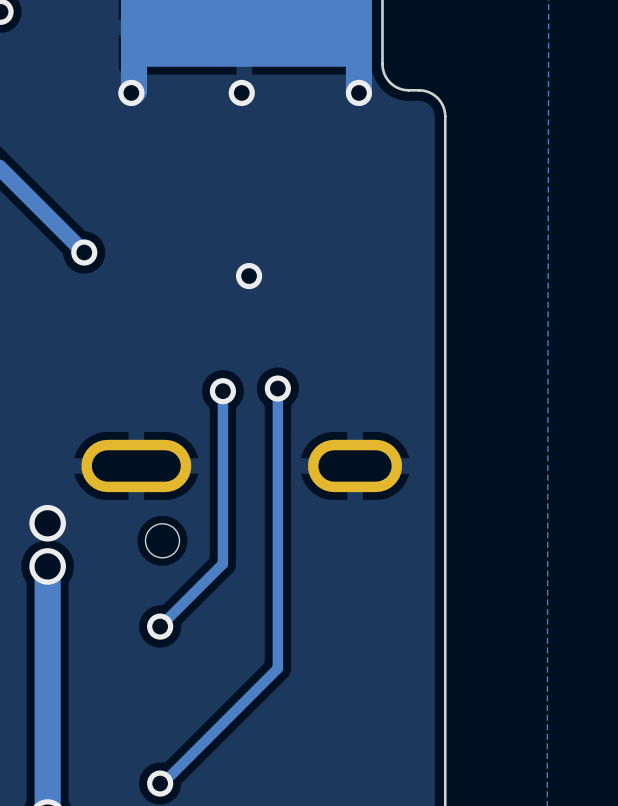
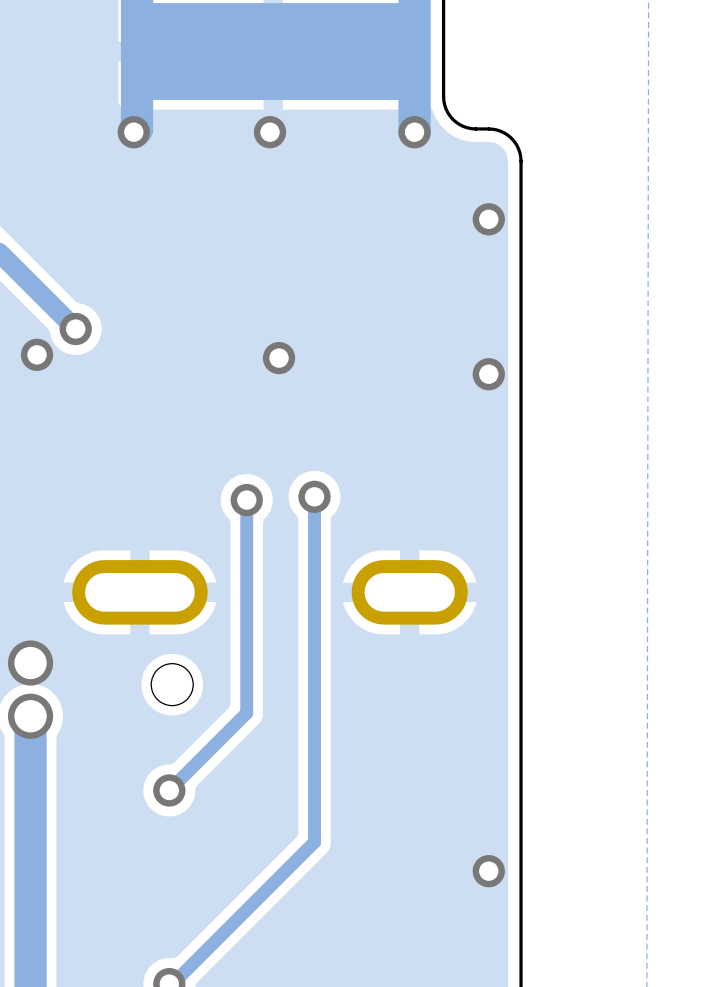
via: none -> (488, 219)
via: none -> (37, 354)
via: none -> (488, 374)
via: none -> (488, 871)

